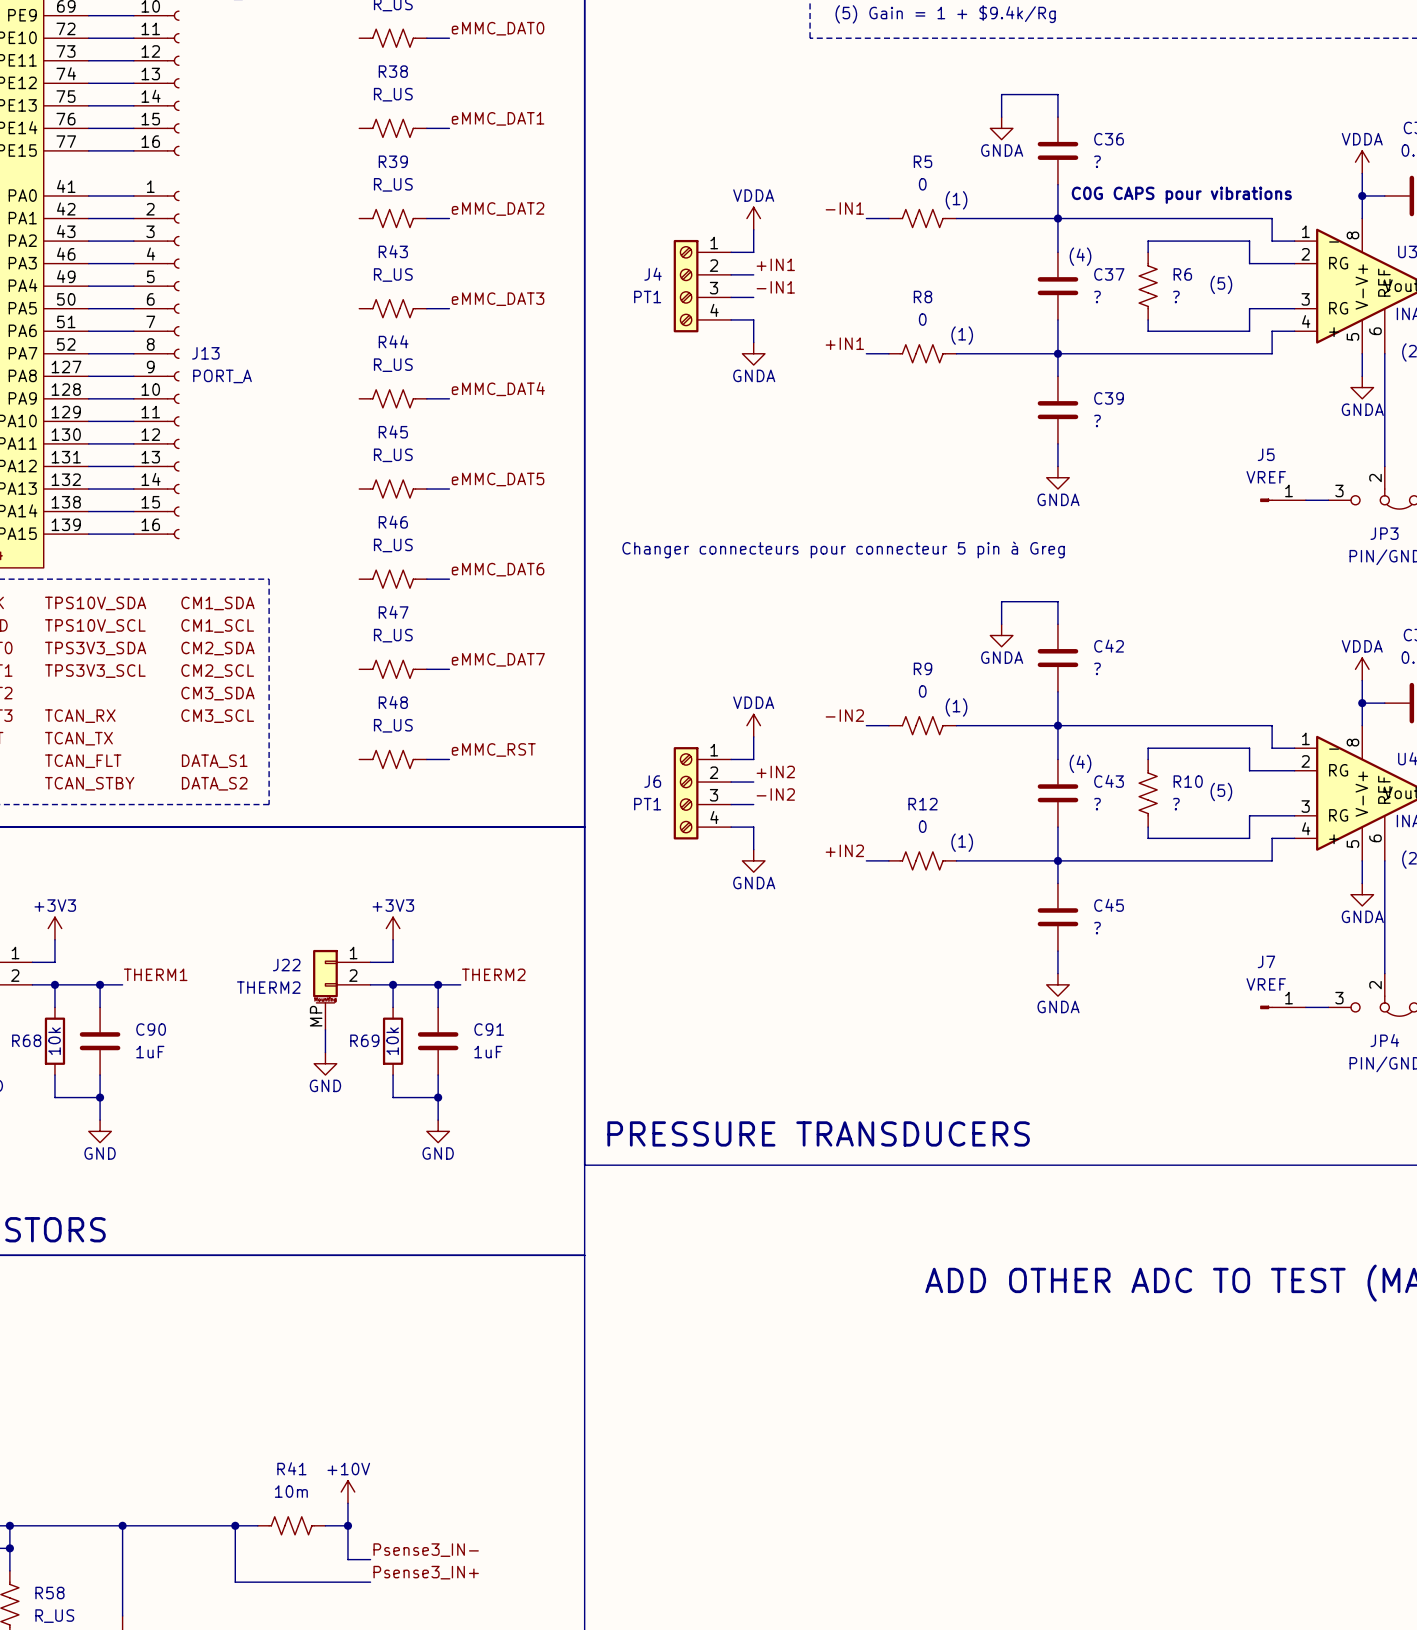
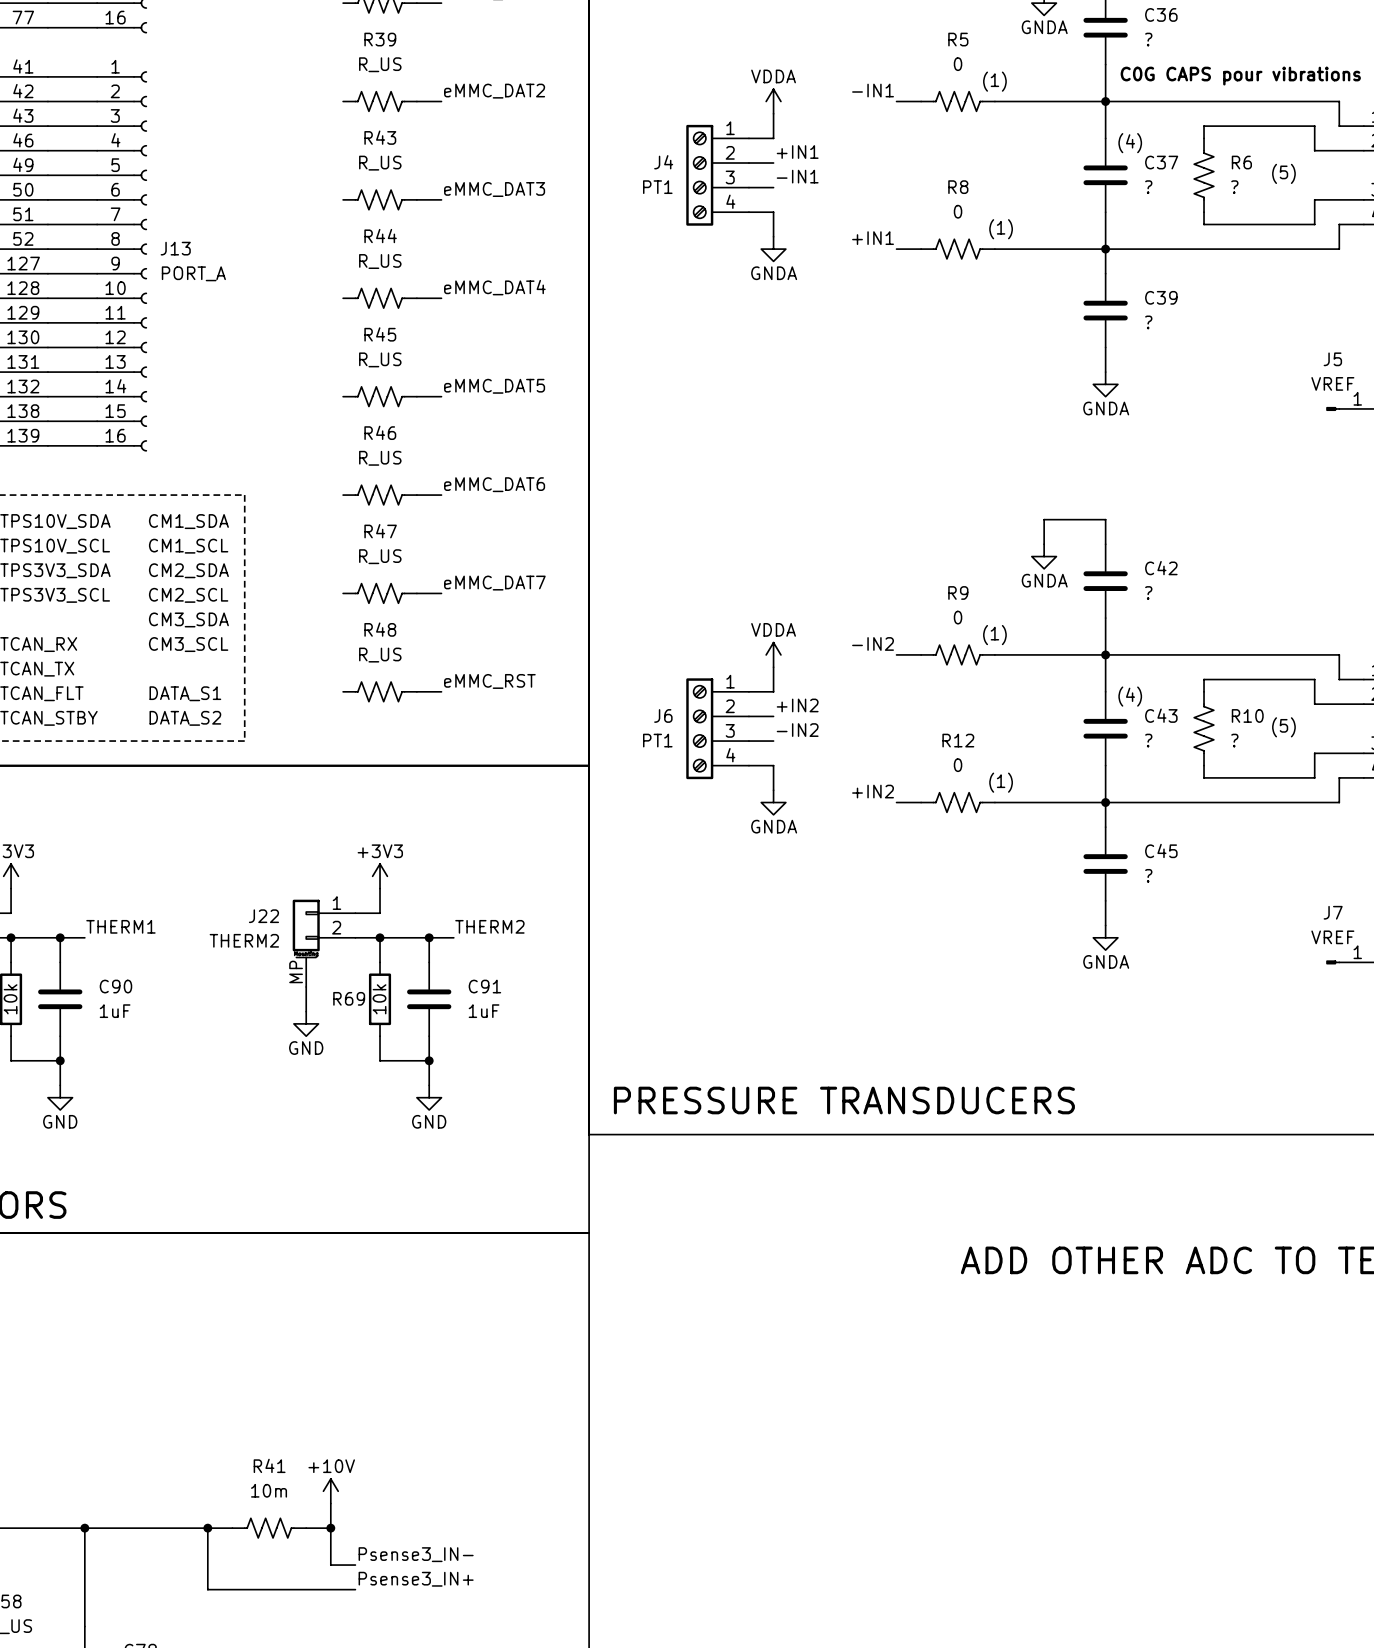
text: Changer connecteurs pour connecteur 5 pin à Greg (843, 549) -> none

